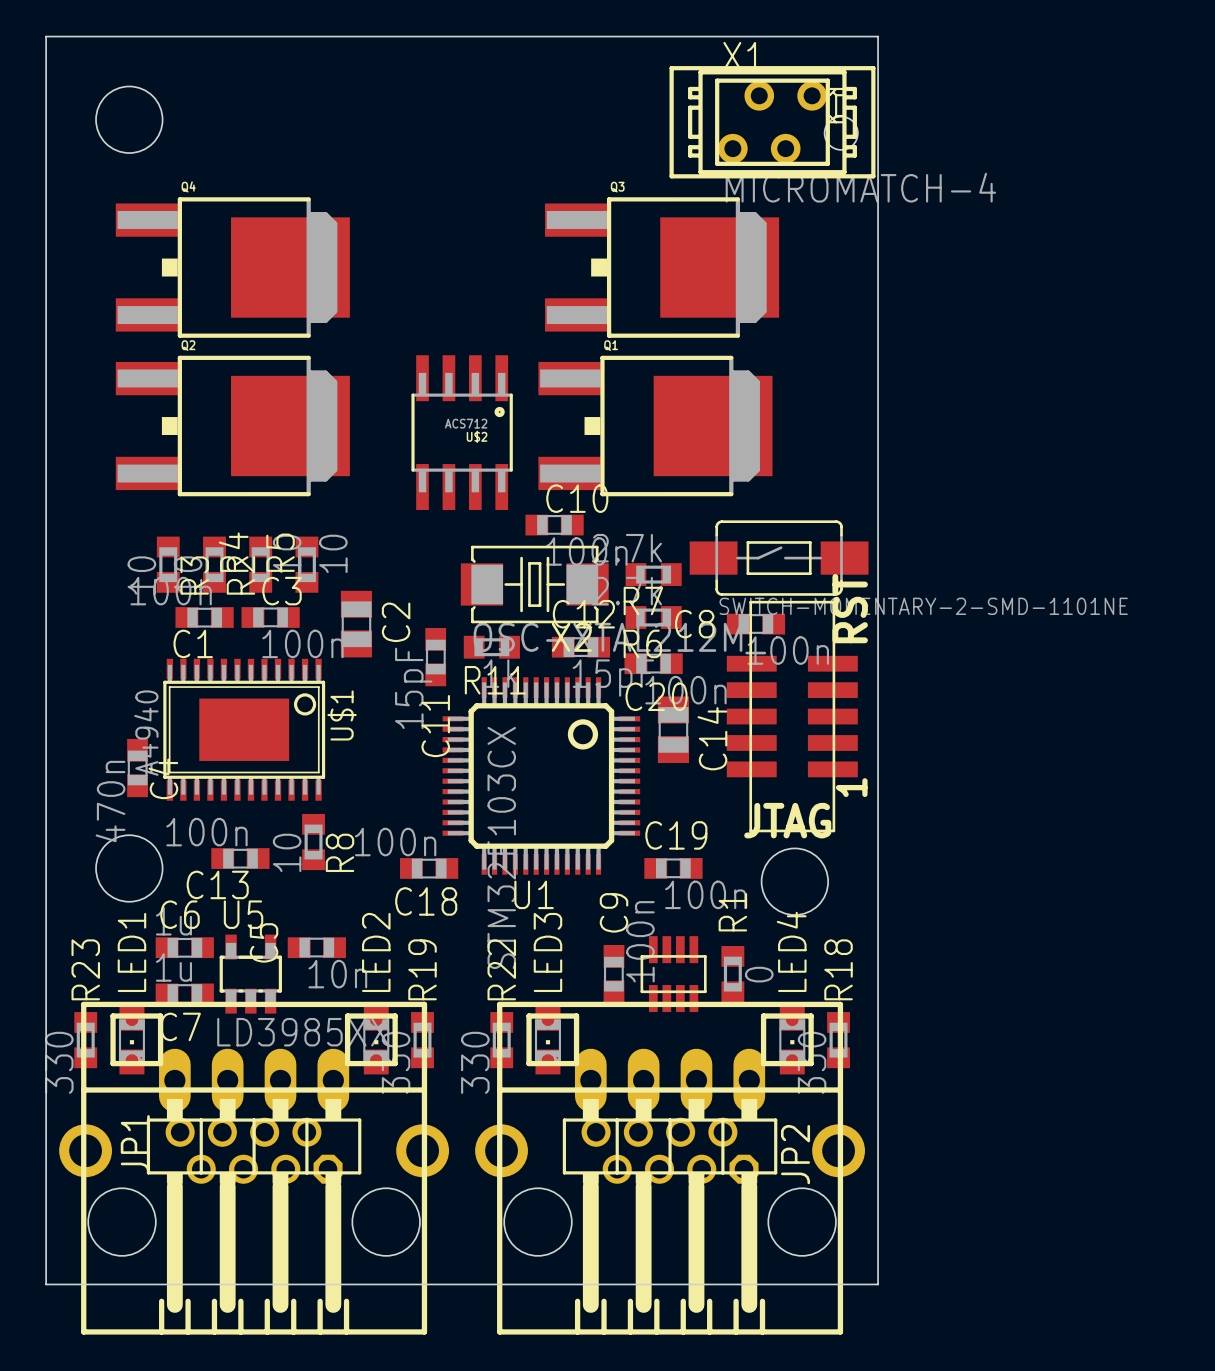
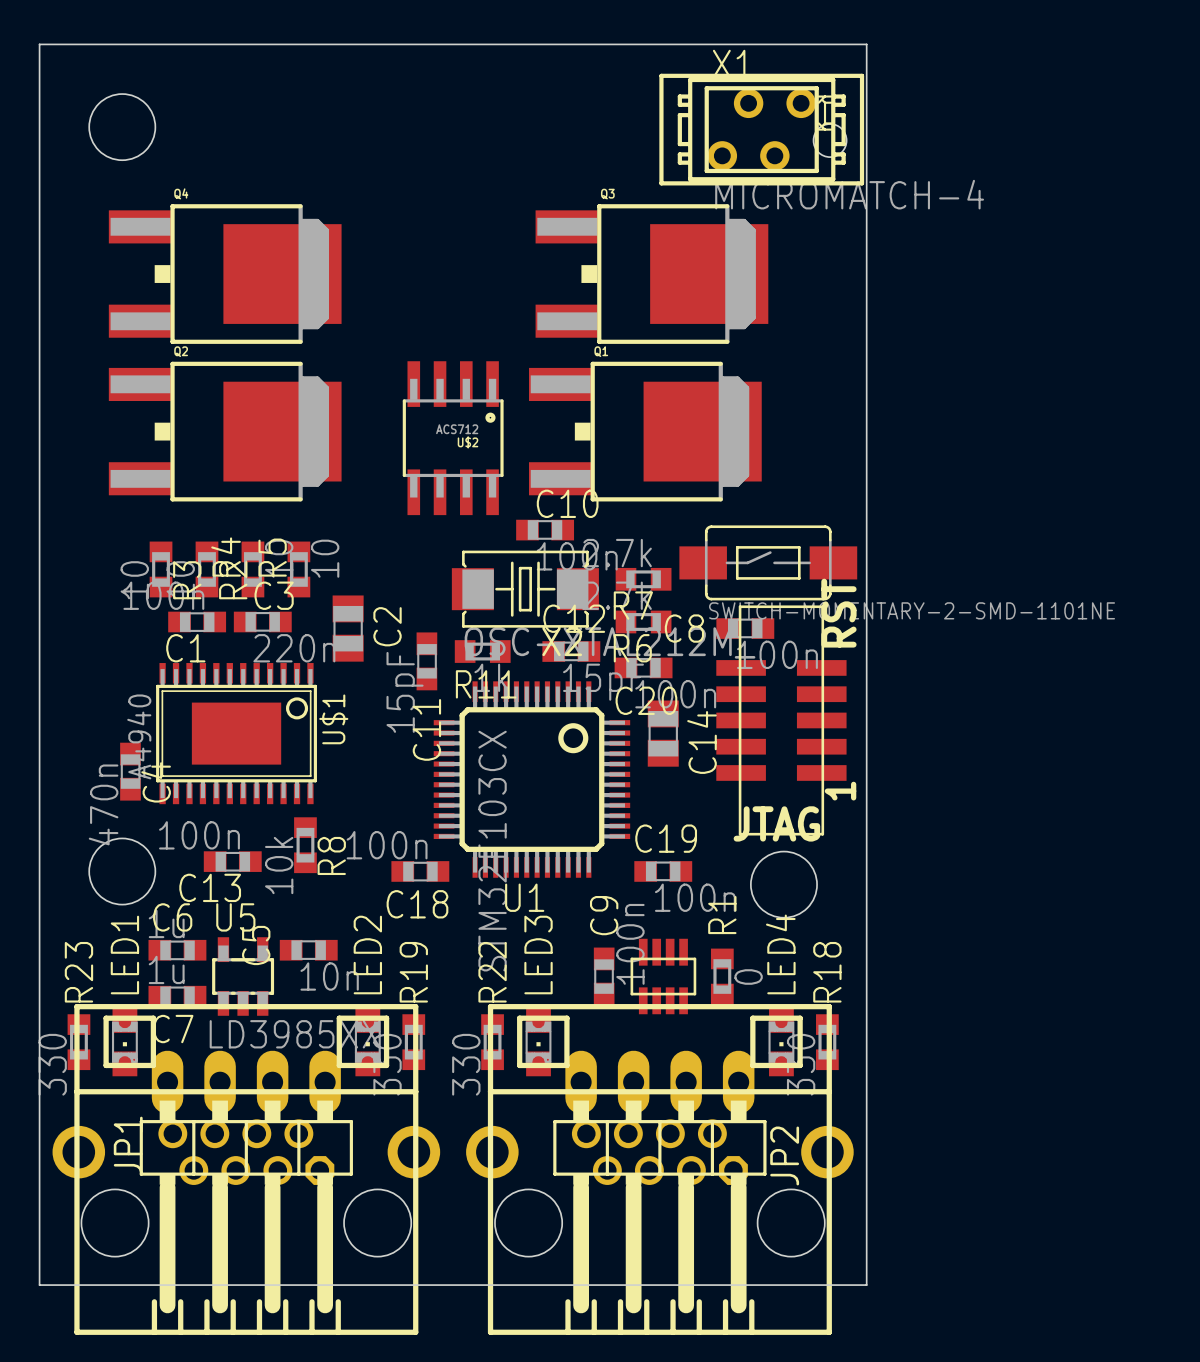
C3 value: 100n (302, 643) -> 220n (294, 648)
R8 value: 10 (287, 852) -> 10k (279, 865)

